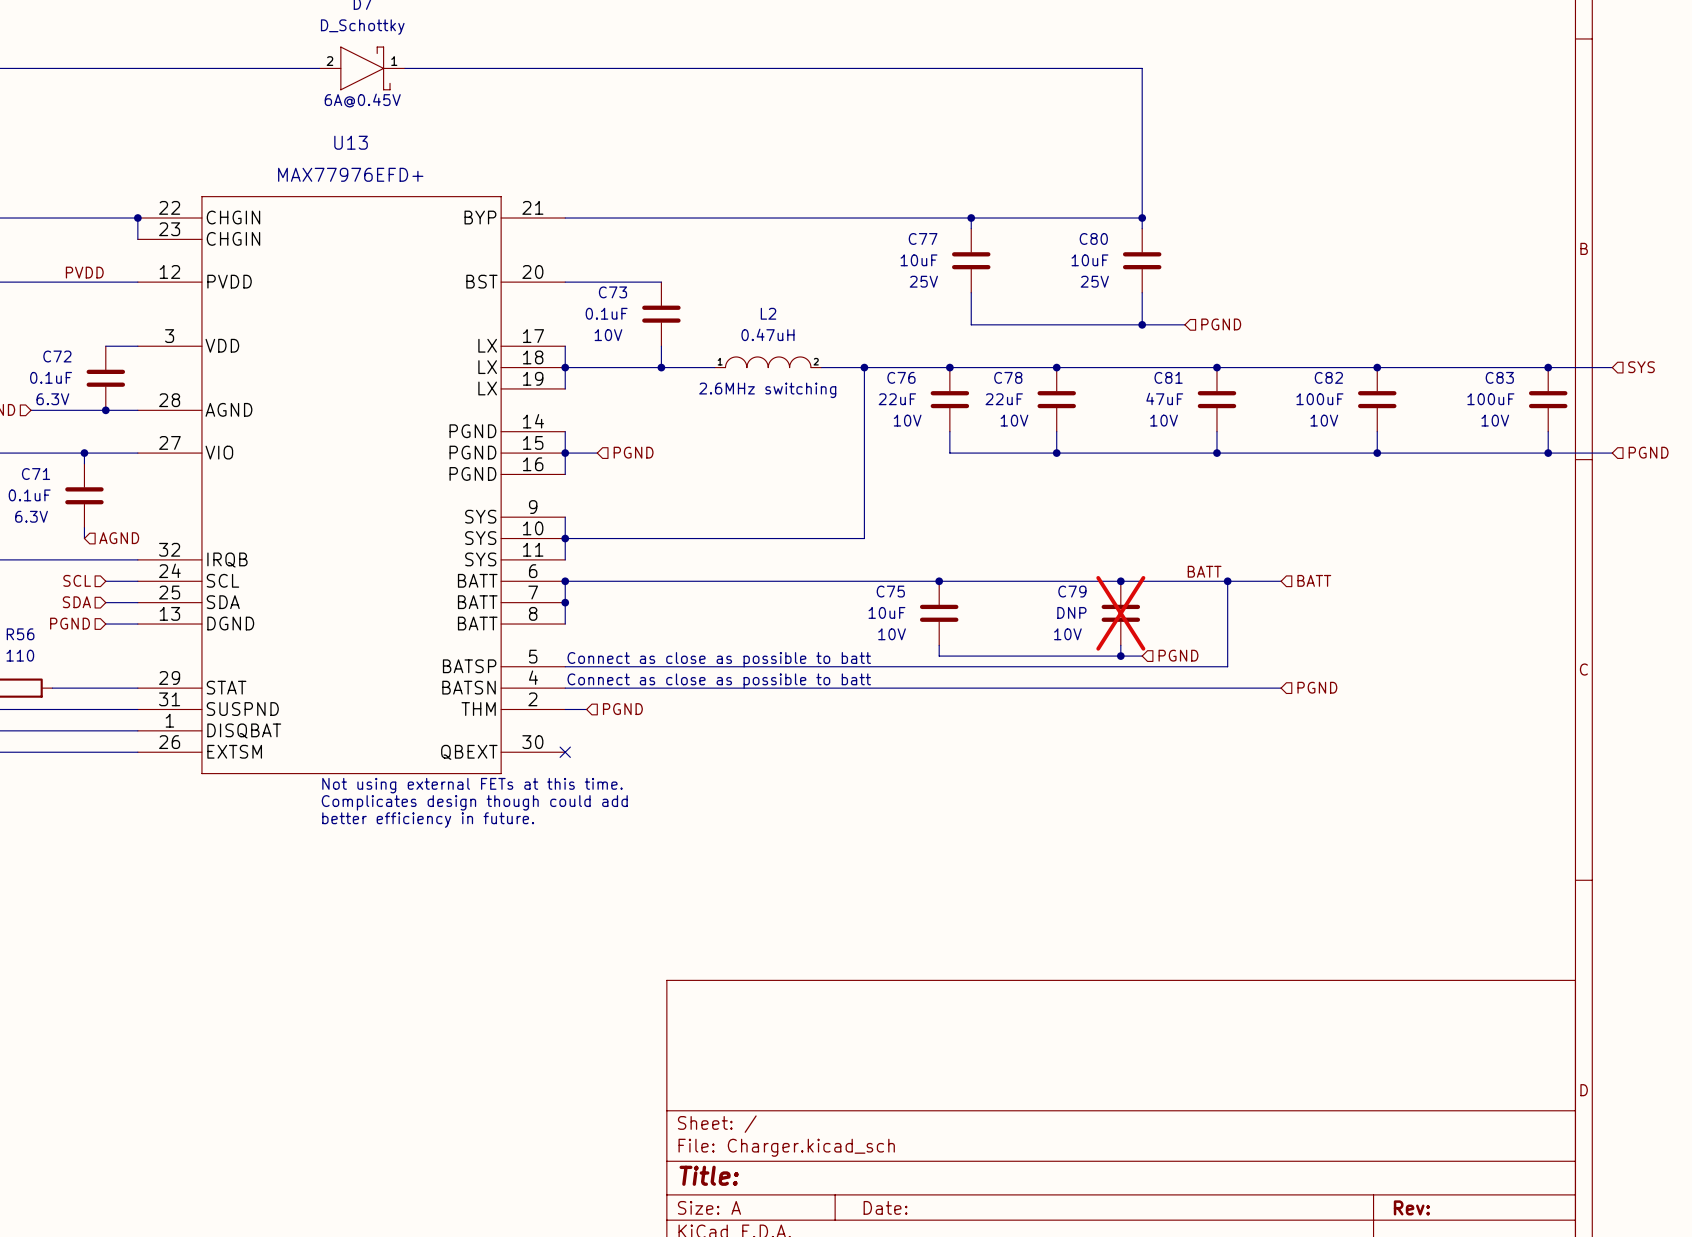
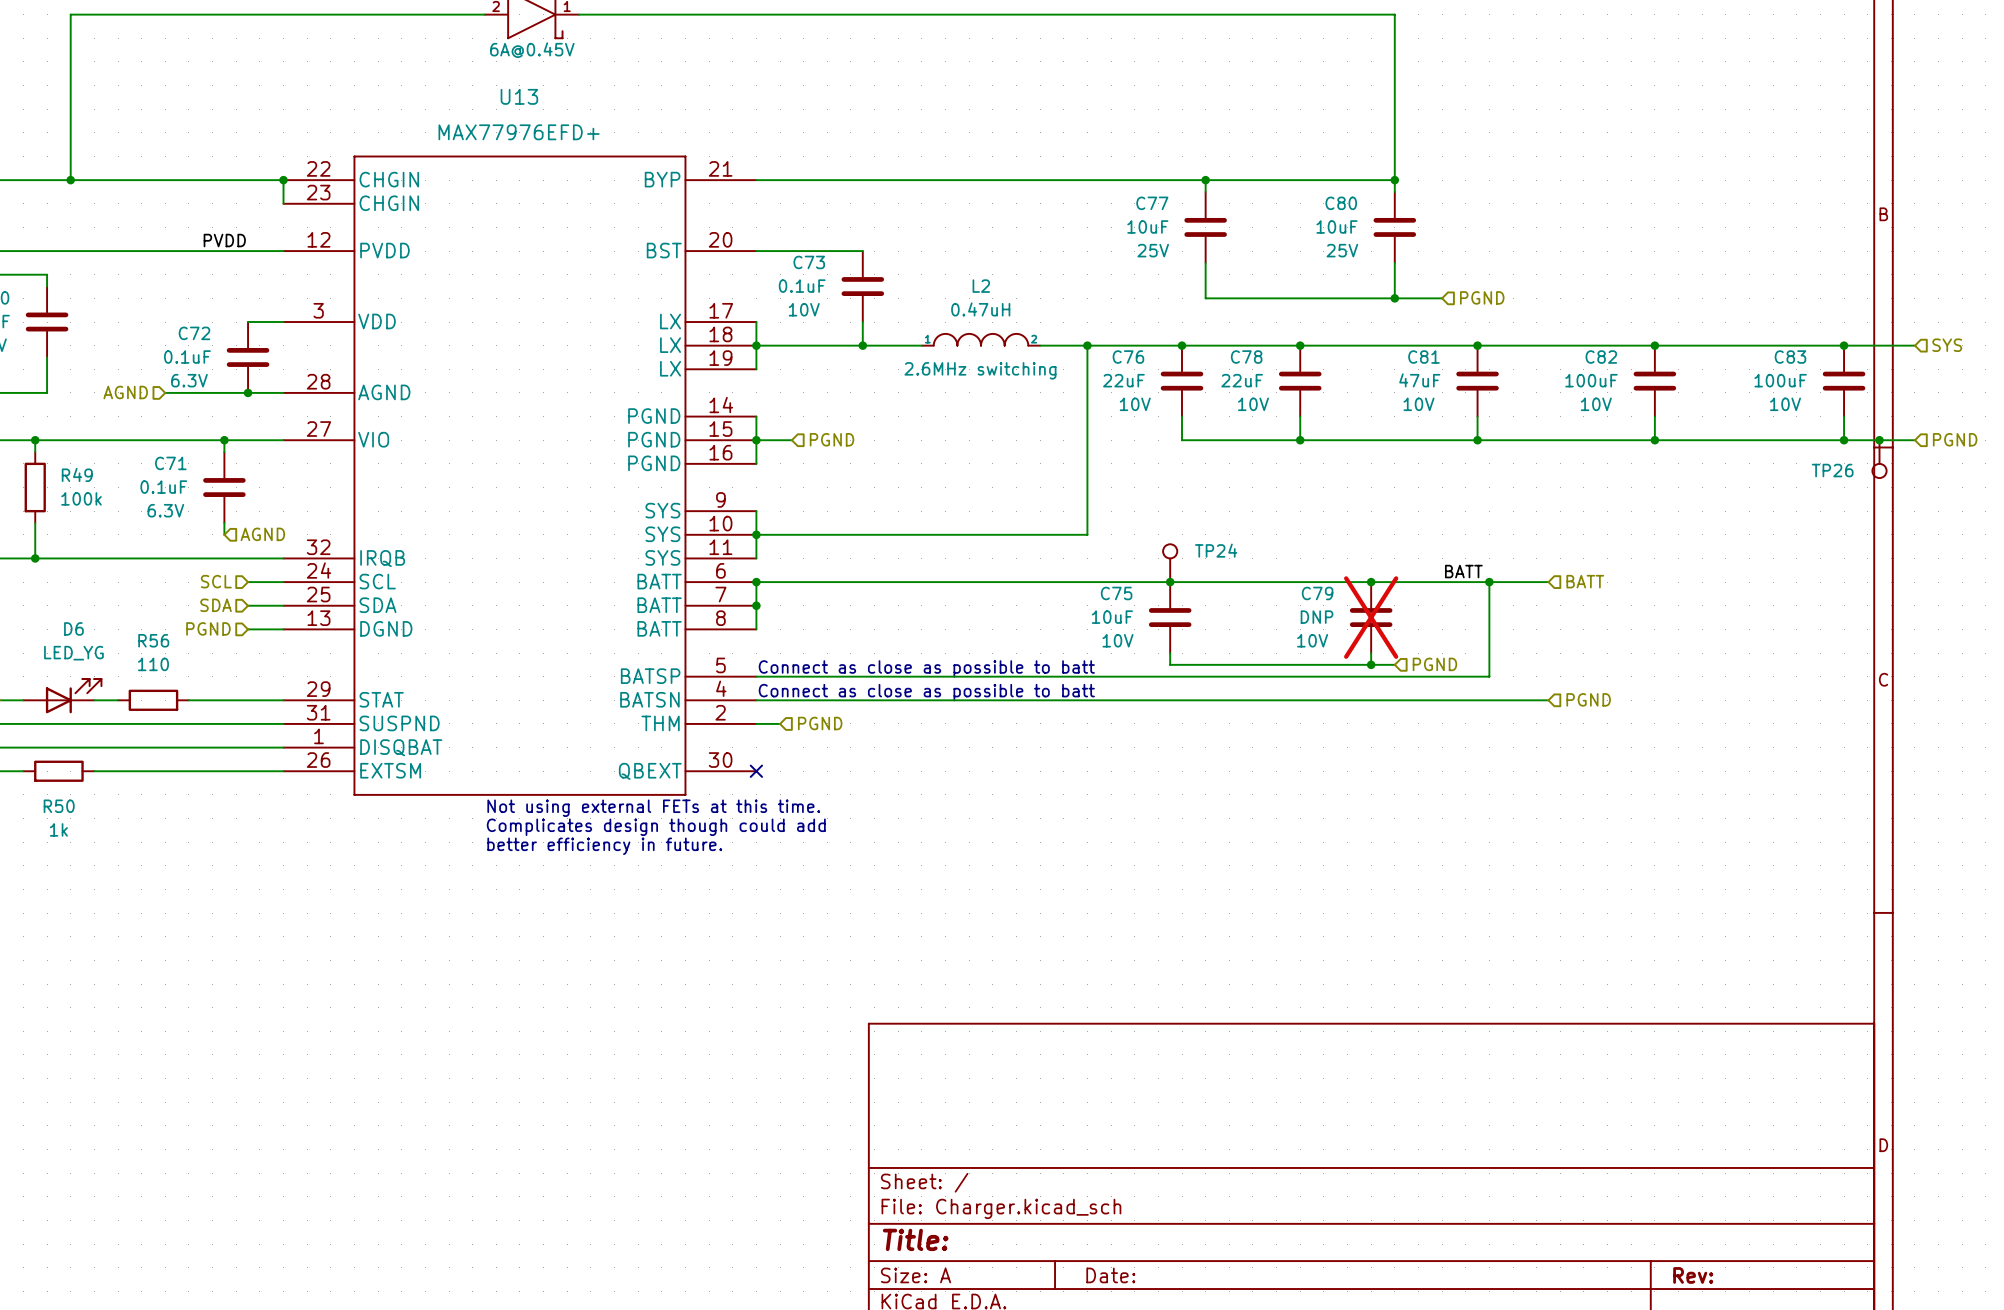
junction: none -> (1879, 440)
TP26: none -> (1879, 459)
TP24: none -> (1170, 563)

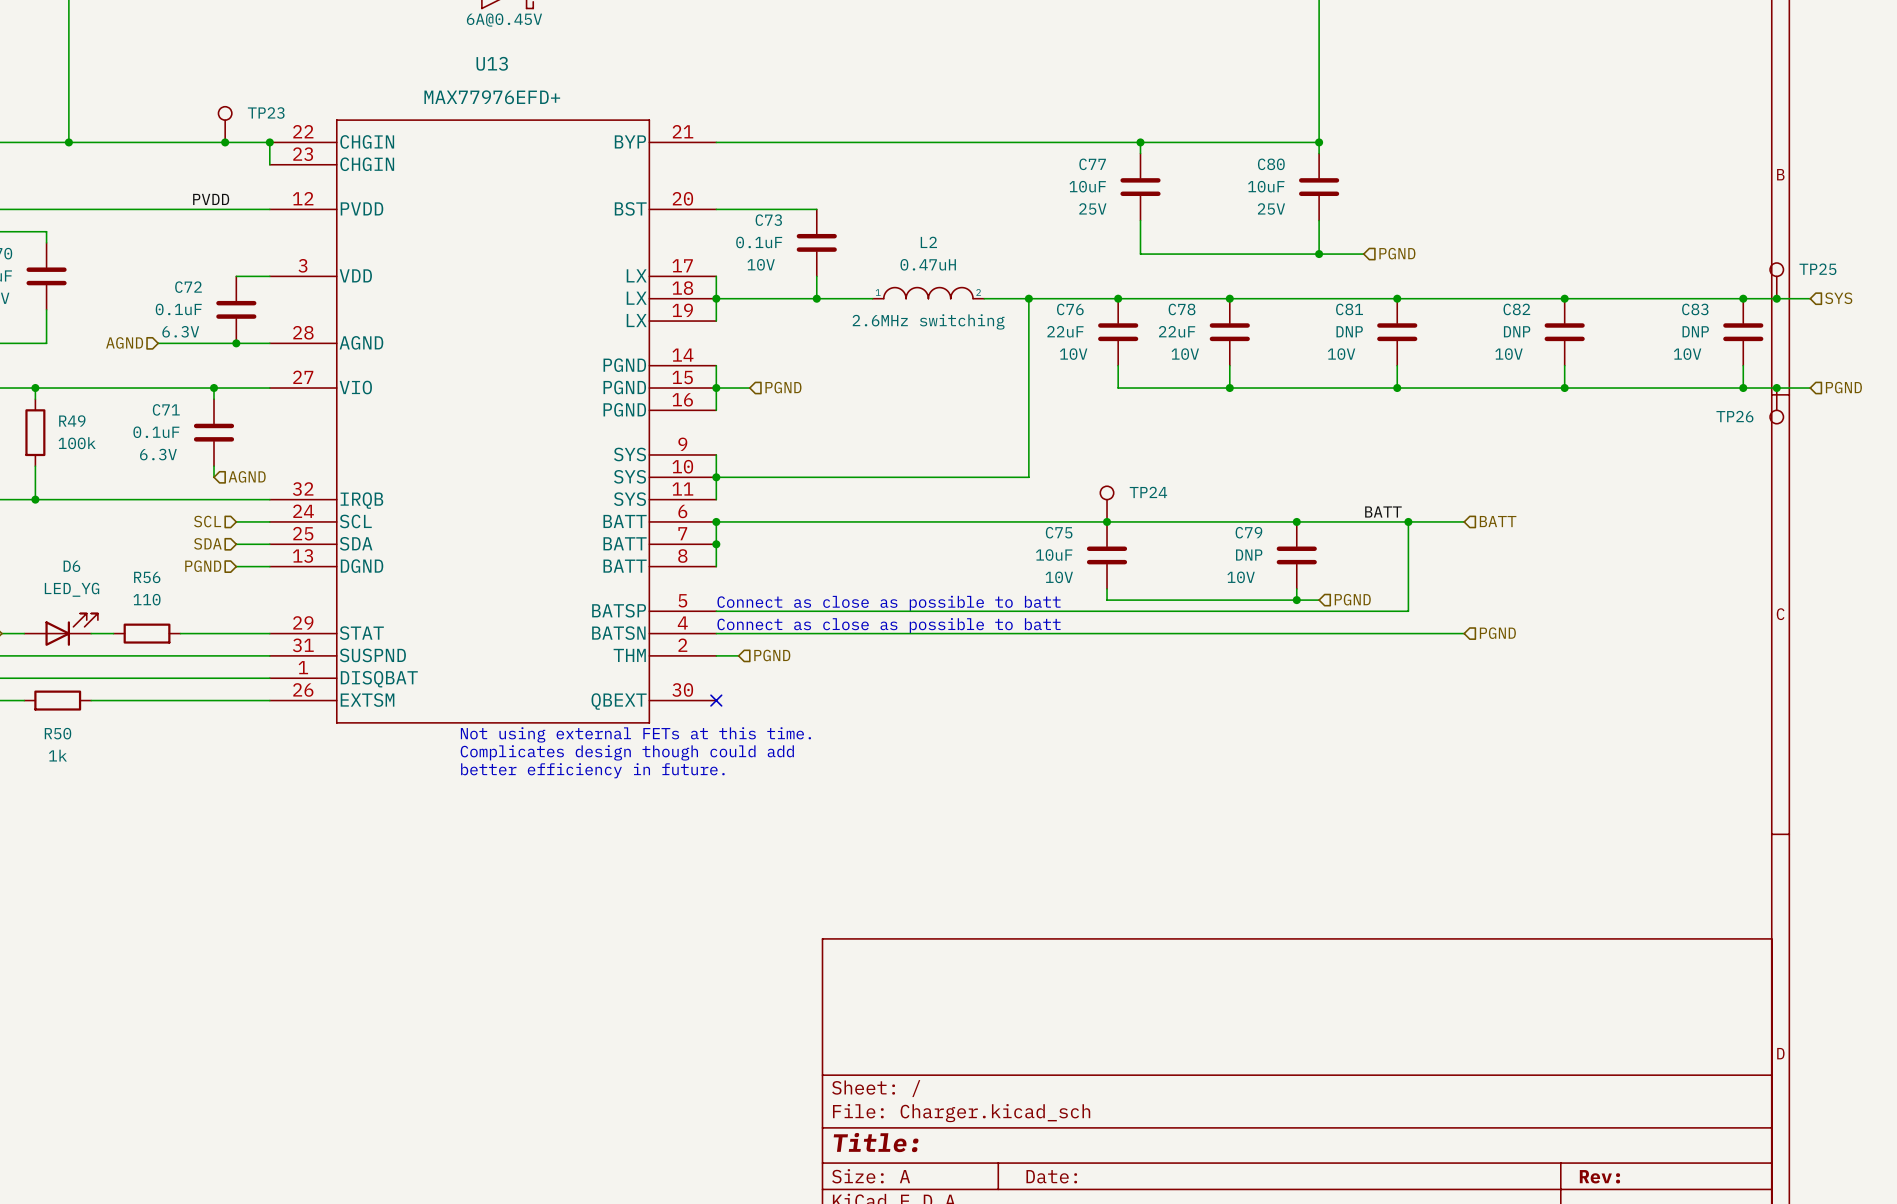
TP23: none -> (225, 124)
junction: none -> (225, 142)
TP25: none -> (1776, 280)
junction: none -> (1776, 298)
C81 value: 47uF (1419, 380) -> DNP (1349, 331)
C82 value: 100uF (1591, 380) -> DNP (1517, 331)
C83 value: 100uF (1780, 380) -> DNP (1695, 331)
C79 do-not-place cross: (1371, 617) -> none

